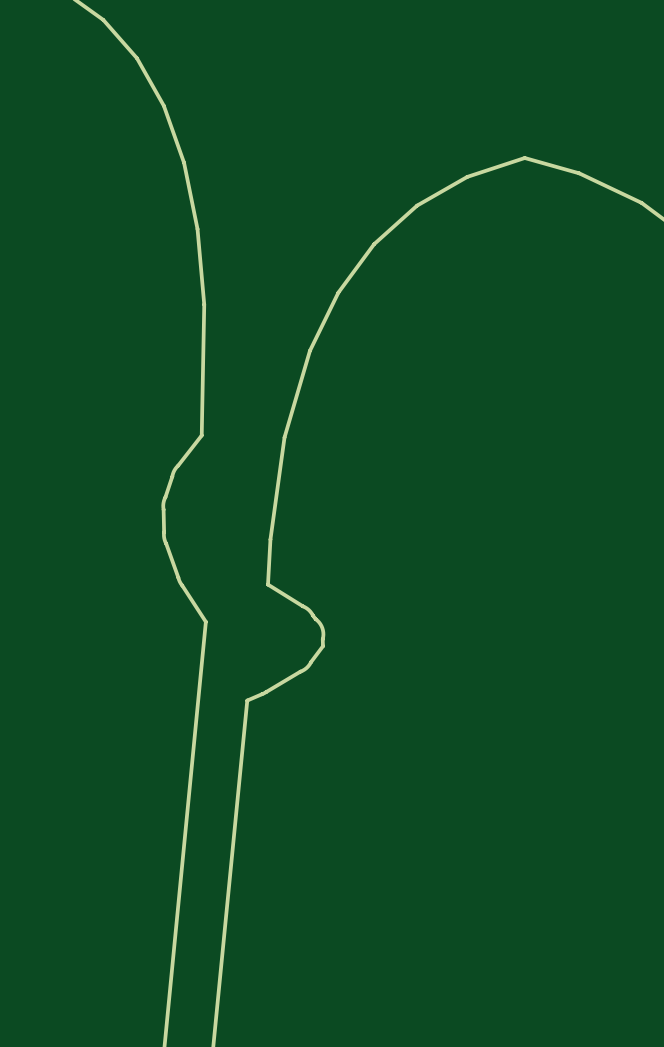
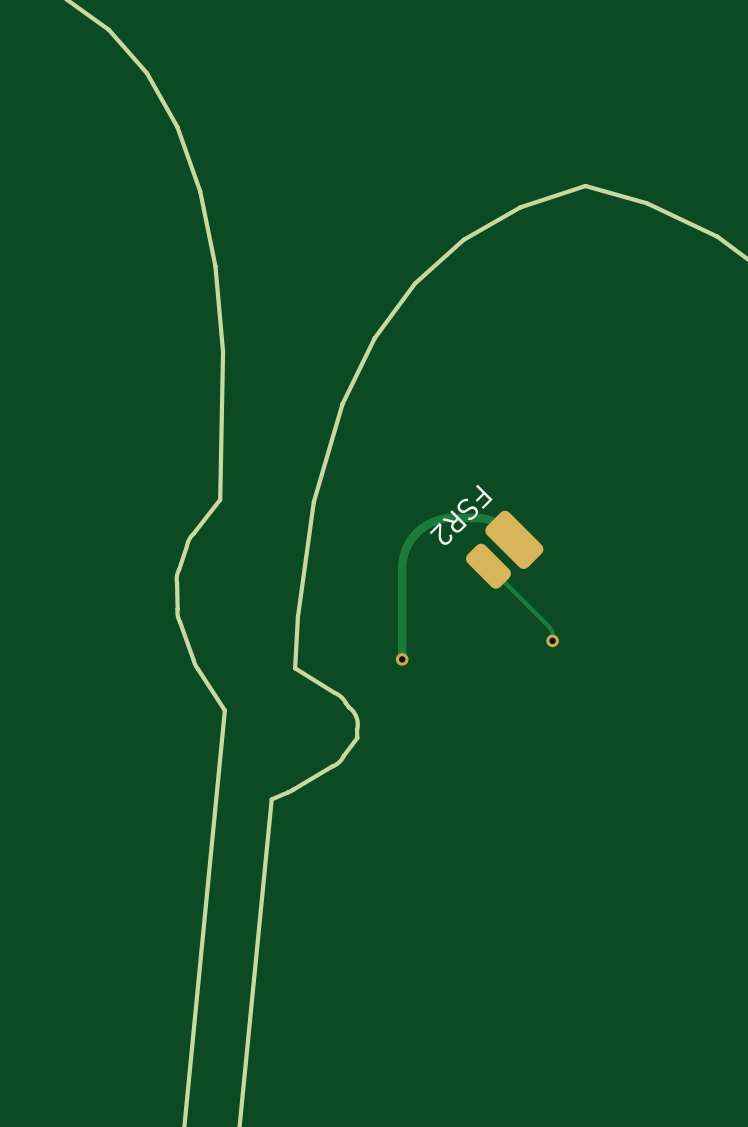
track: none -> (514, 539) (497, 524) (480, 518) (439, 519) (427, 524) (416, 532) (408, 543) (402, 561) (402, 659)
FSR2: none -> (504, 549)
track: none -> (488, 566) (549, 627) (552, 640)
via: none -> (552, 640)
via: none -> (402, 659)

